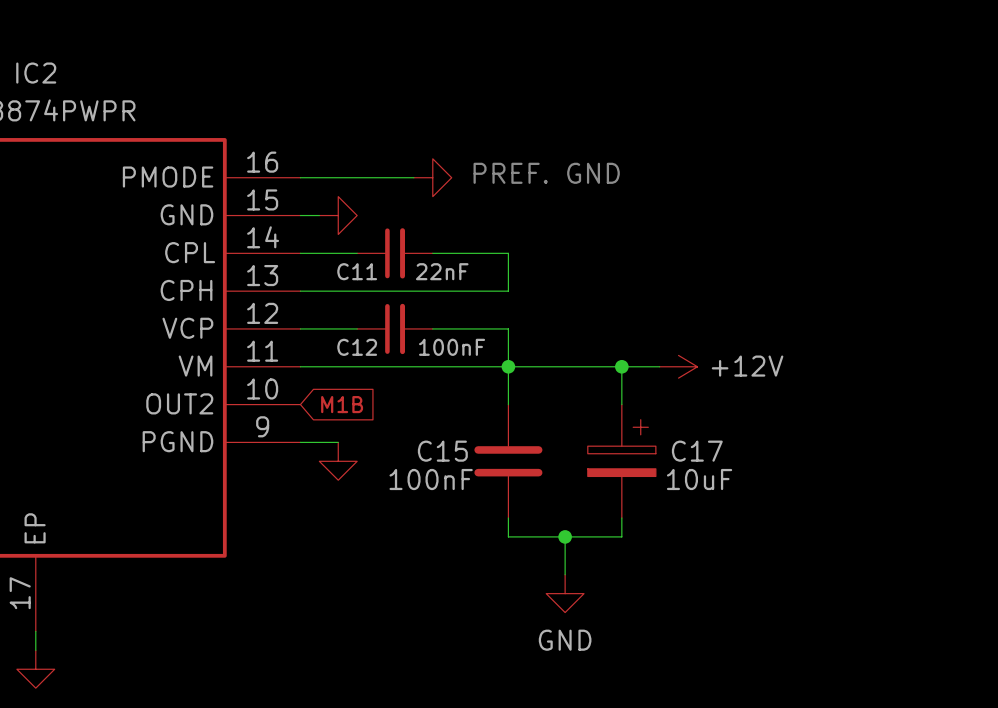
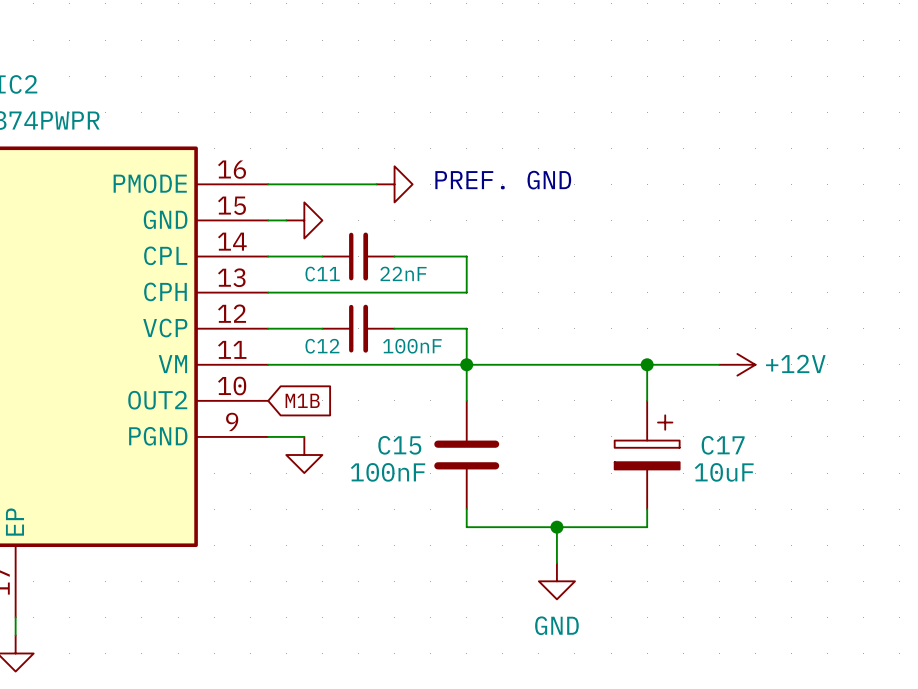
wire: (621, 366) (621, 404) -> (647, 364) (647, 400)
junction position: (621, 366) -> (647, 364)
wire: none -> (611, 364) (719, 364)
power symbol position: +12V (678, 366) -> +12V (737, 364)
C17 position: (621, 461) -> (647, 455)
wire: (621, 518) (621, 536) -> (647, 509) (647, 527) (574, 527)
wire: (565, 536) (565, 574) -> (556, 527) (556, 563)
junction position: (565, 536) -> (556, 527)
power symbol position: GND (565, 593) -> GND (556, 581)

